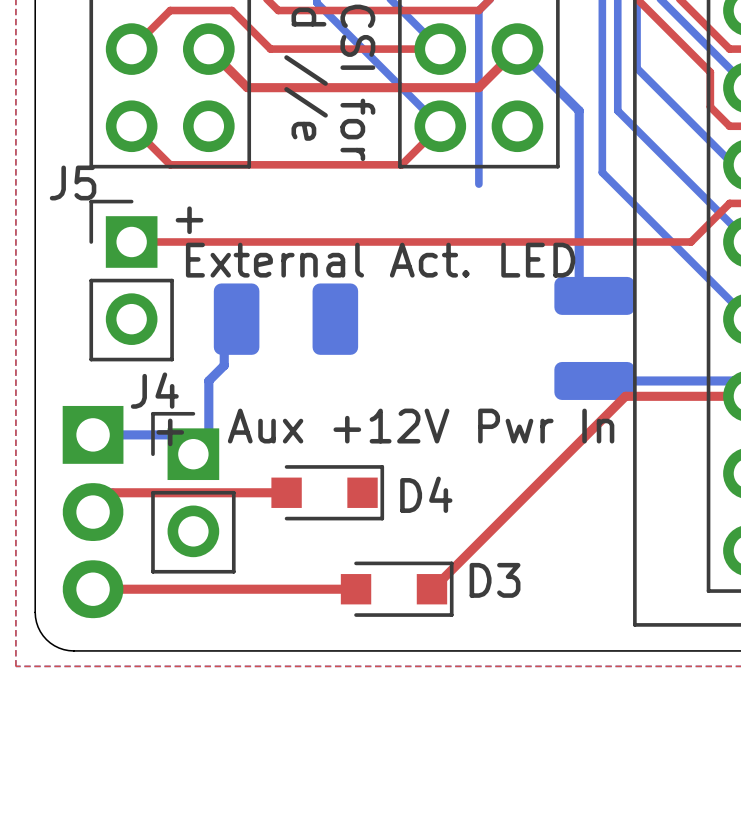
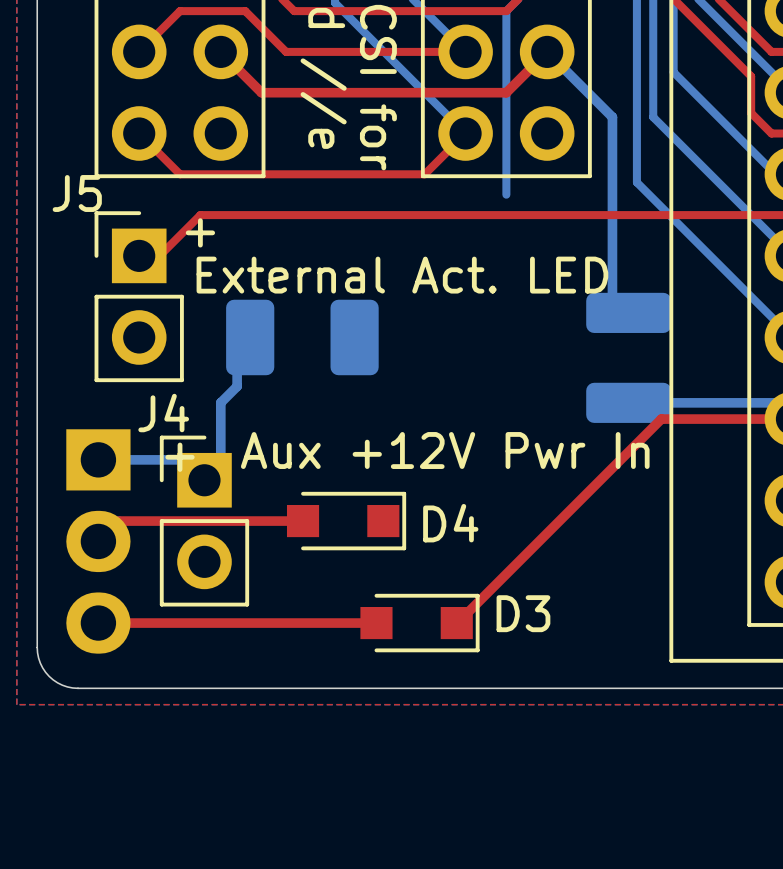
top track: (729, 203) (691, 241) (150, 241) -> (771, 215) (200, 215) (159, 255)

